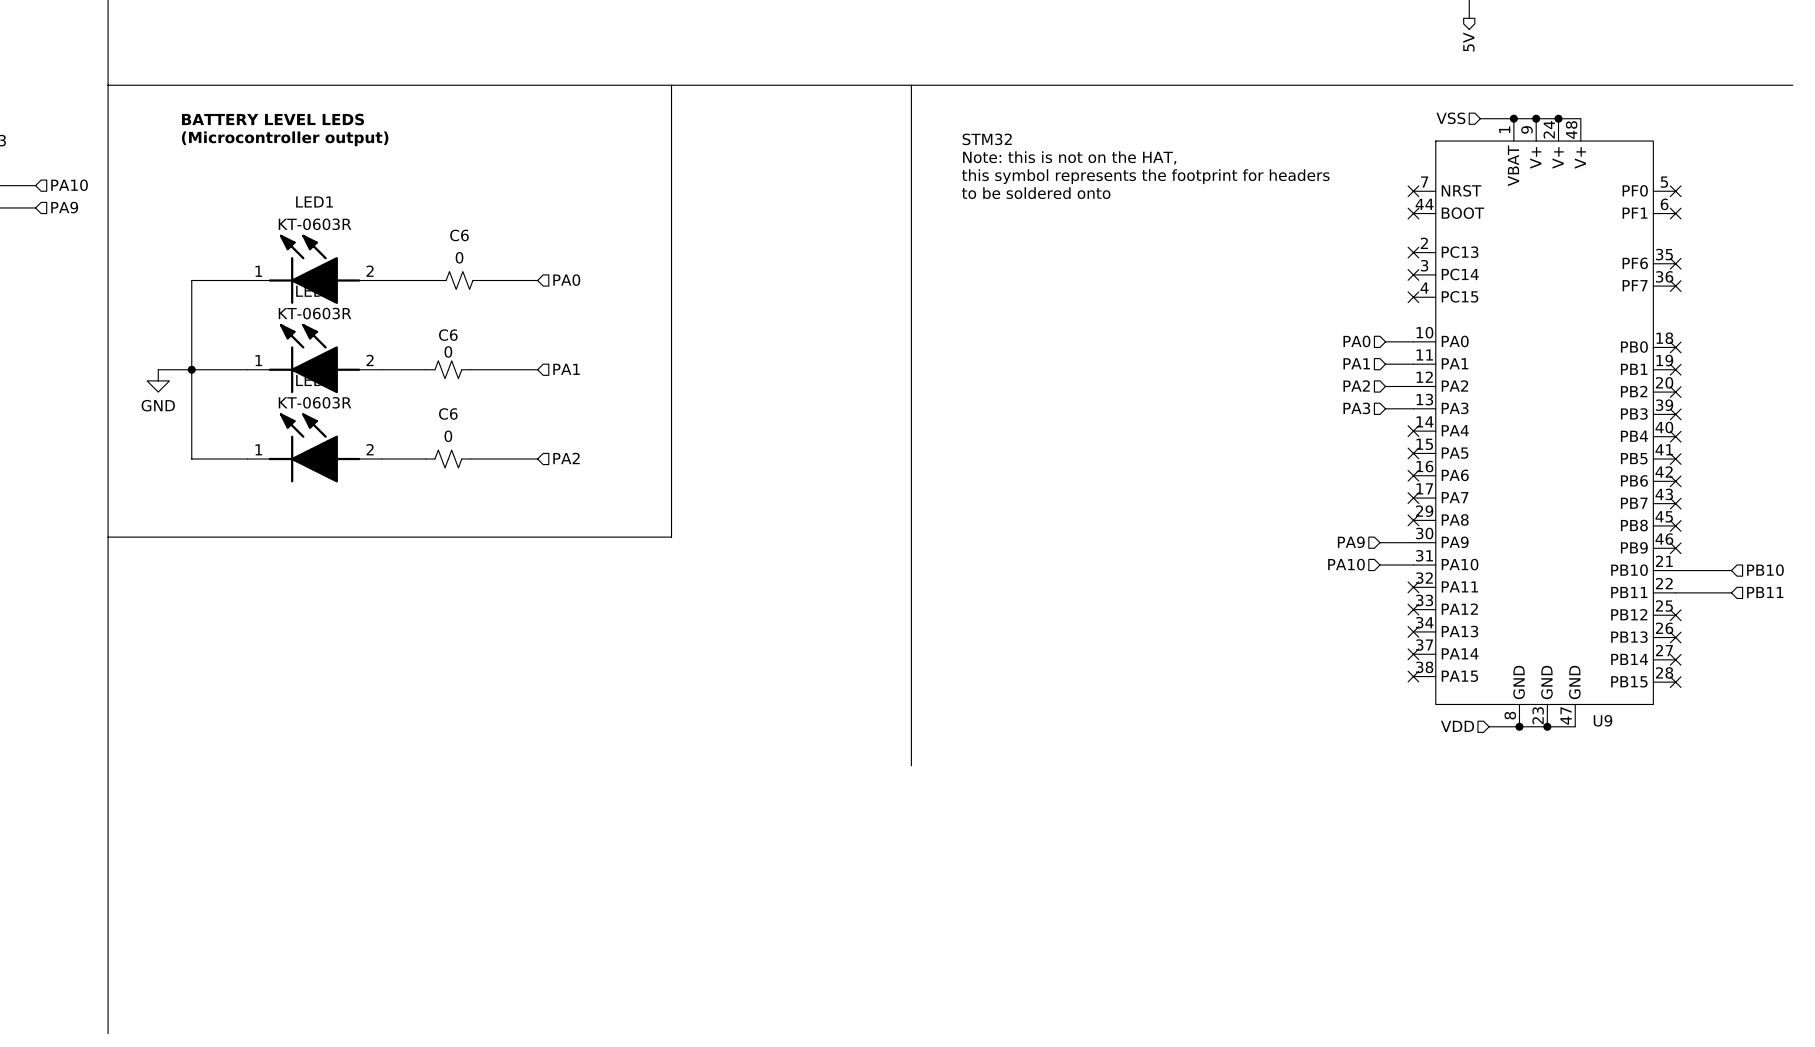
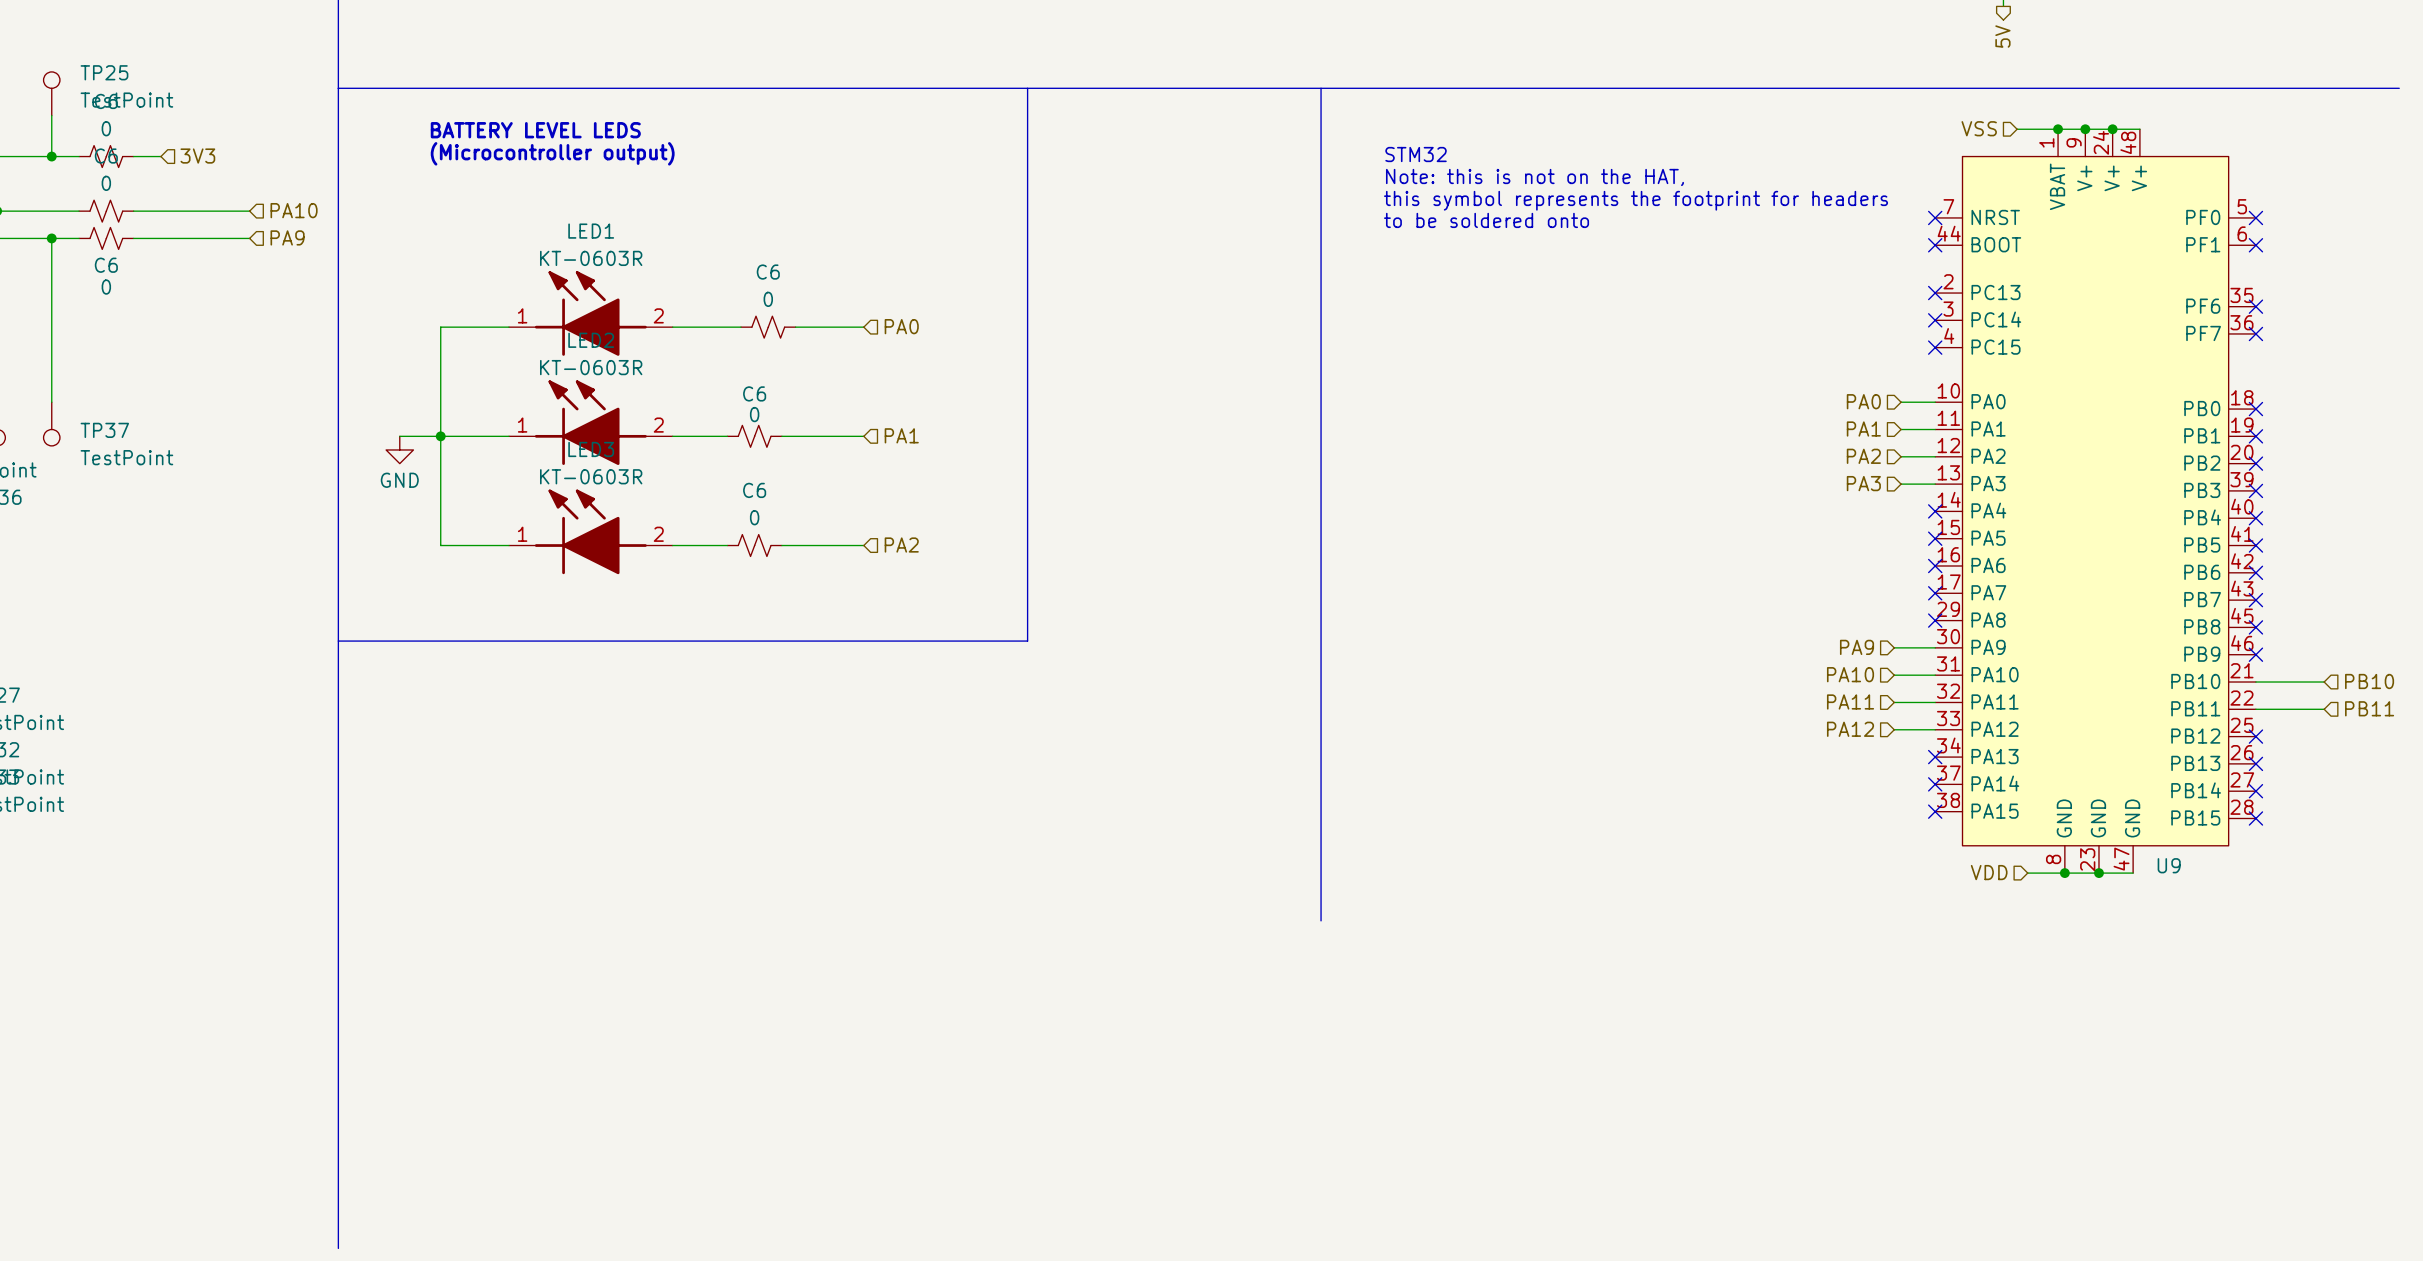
hierarchical label: none -> PA11 (1850, 701)
wire: none -> (1894, 702) (1935, 702)
no-connect mark: (1413, 587) -> none
hierarchical label: none -> PA12 (1850, 729)
wire: none -> (1894, 729) (1935, 729)
no-connect mark: (1413, 609) -> none

